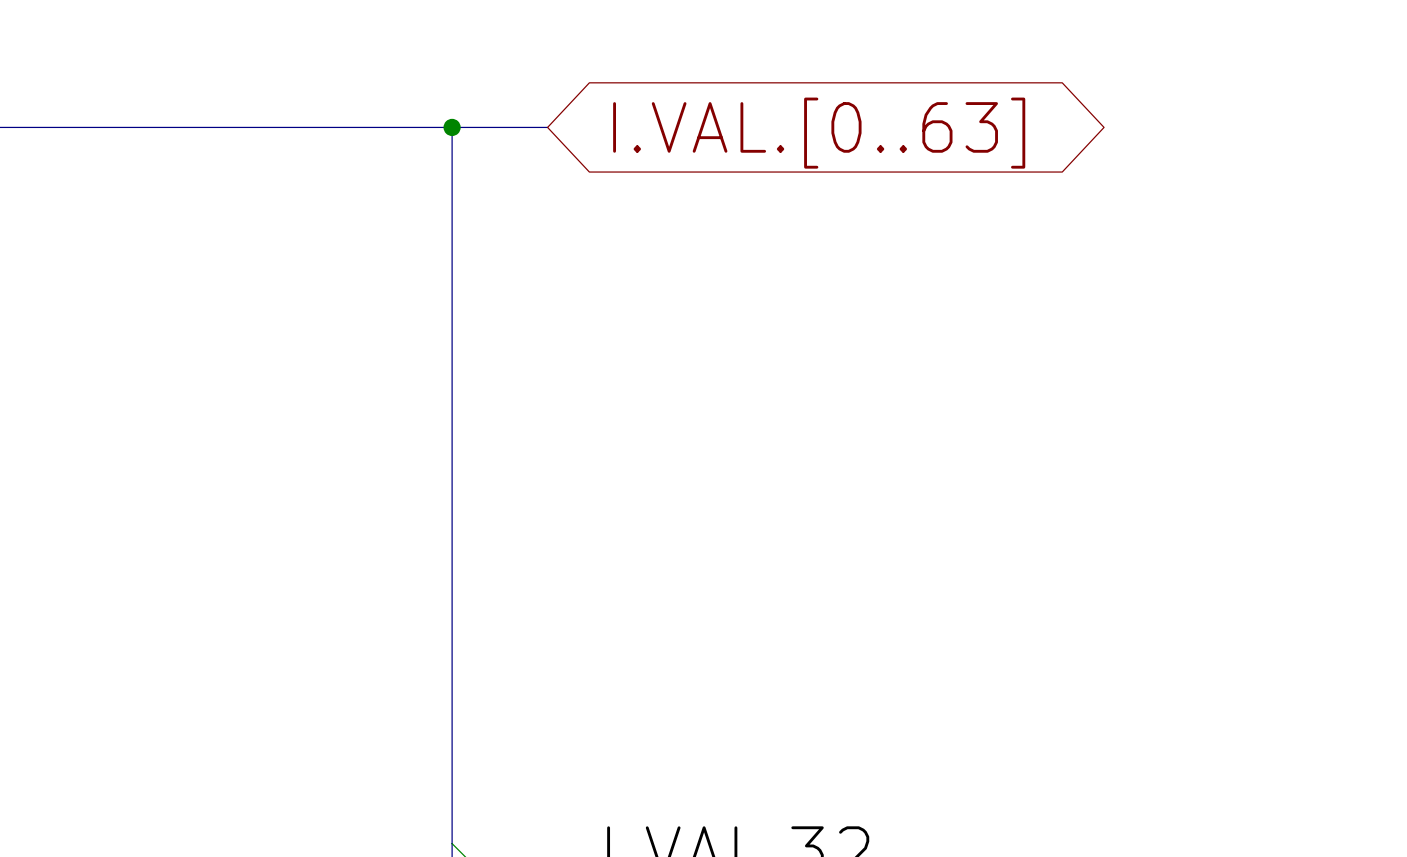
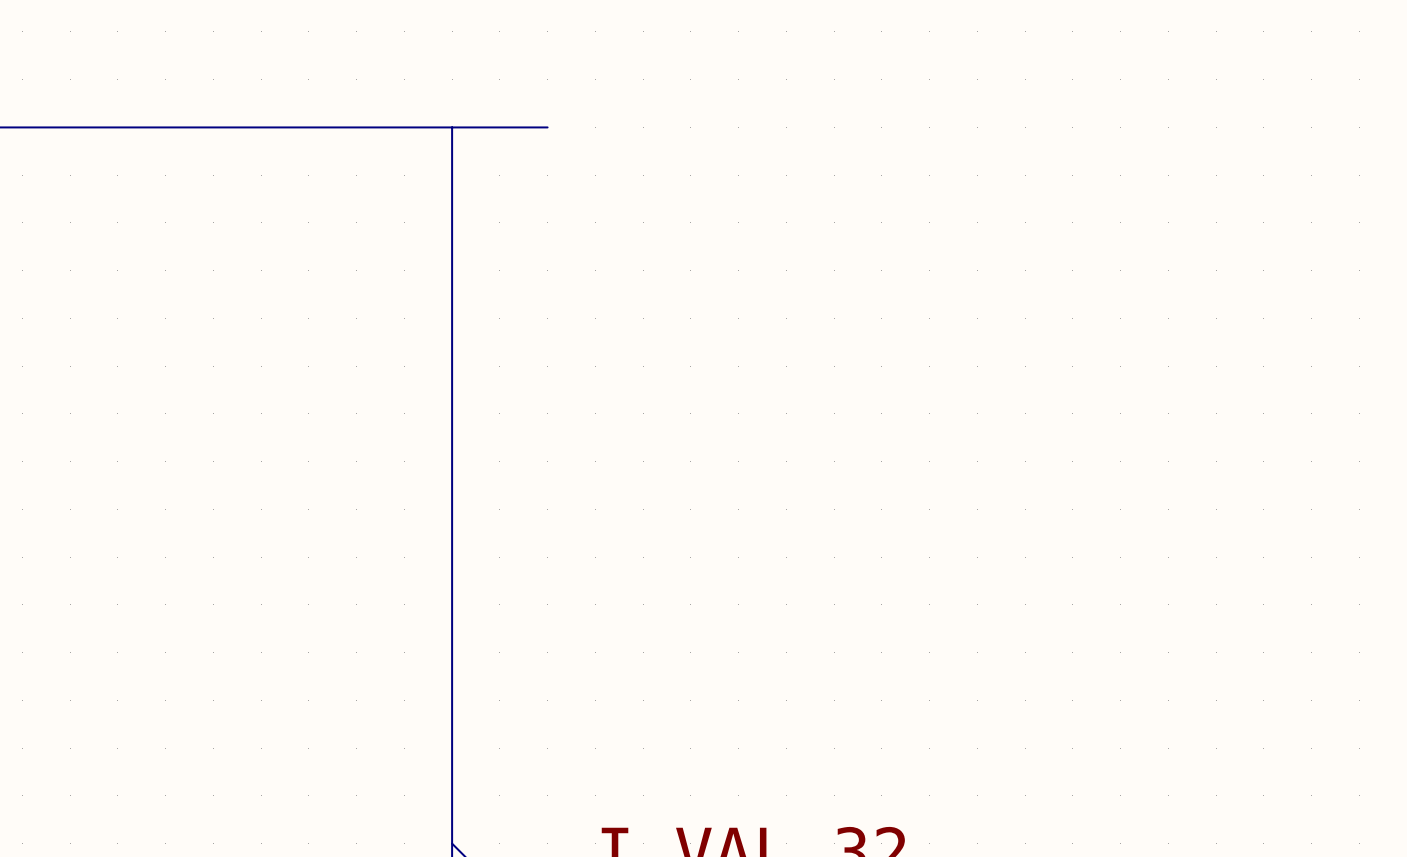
junction: (452, 127) -> none
global label: I.VAL.[0..63] (819, 133) -> none

